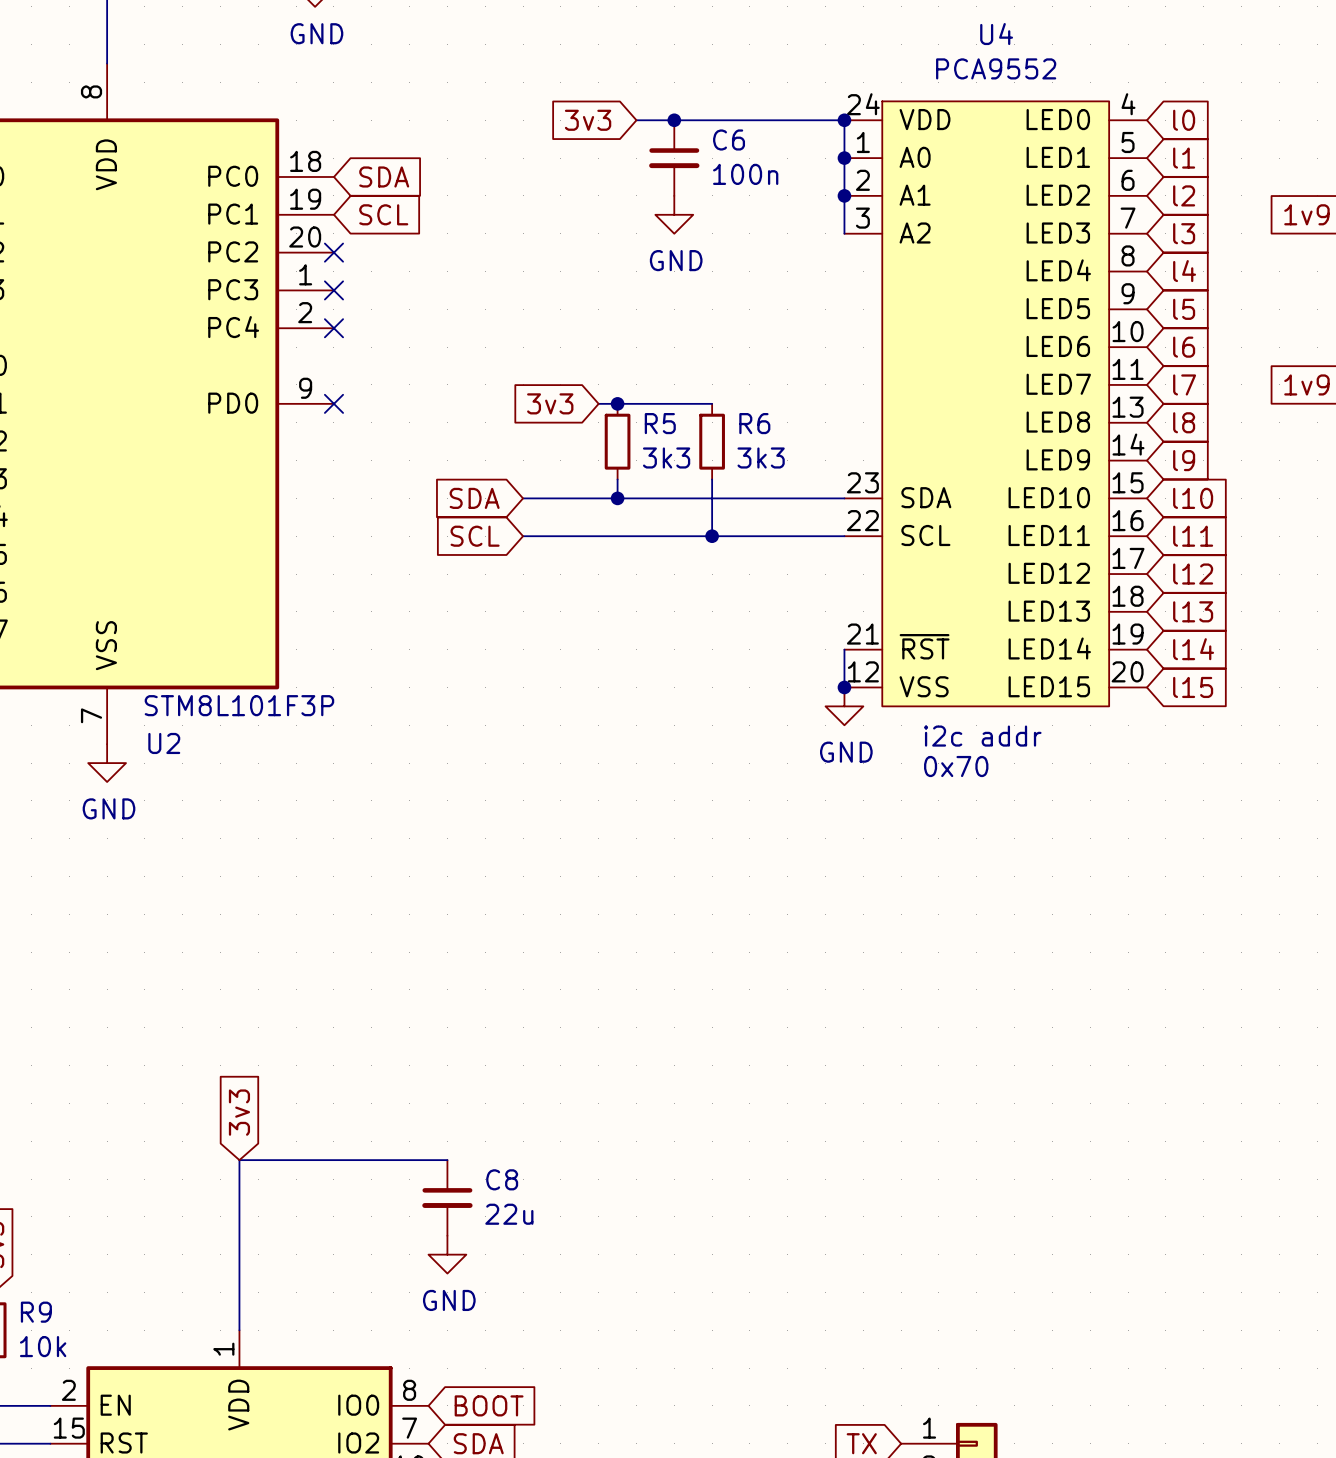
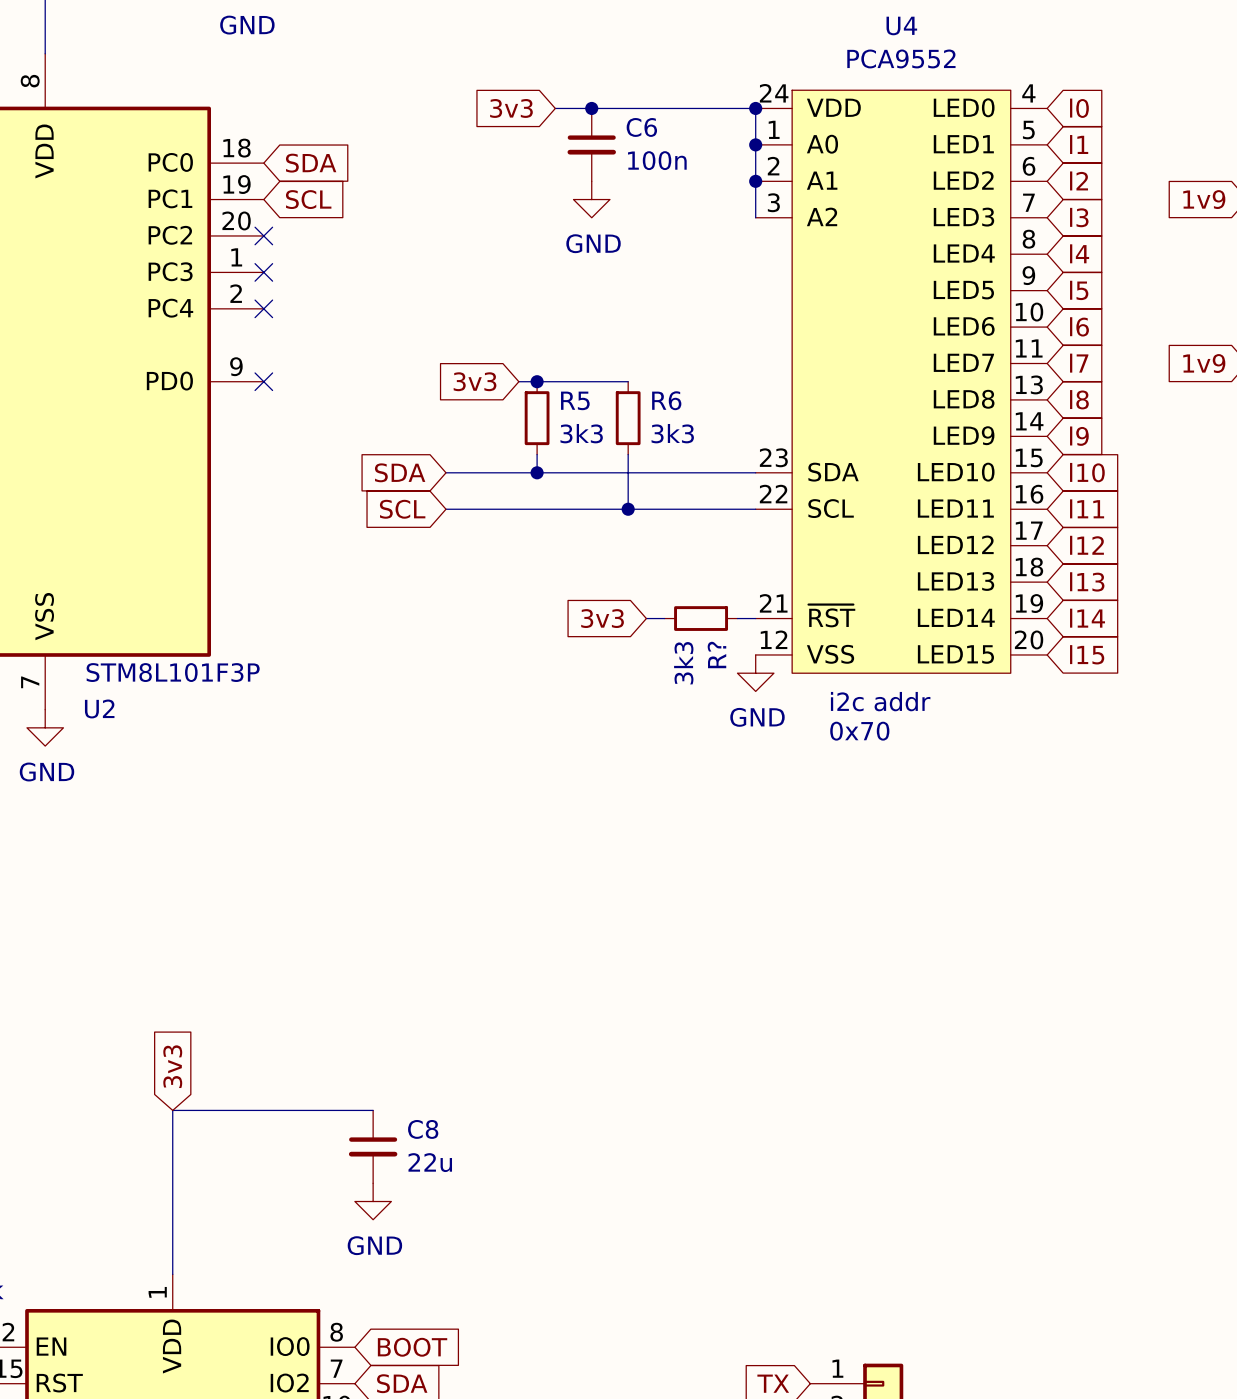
global label: none -> 3v3 (602, 618)
wire: none -> (646, 618) (664, 618)
R?: none -> 3k3 (701, 618)
wire: (844, 649) (844, 687) -> (755, 618) (737, 618)
junction: (844, 687) -> none

